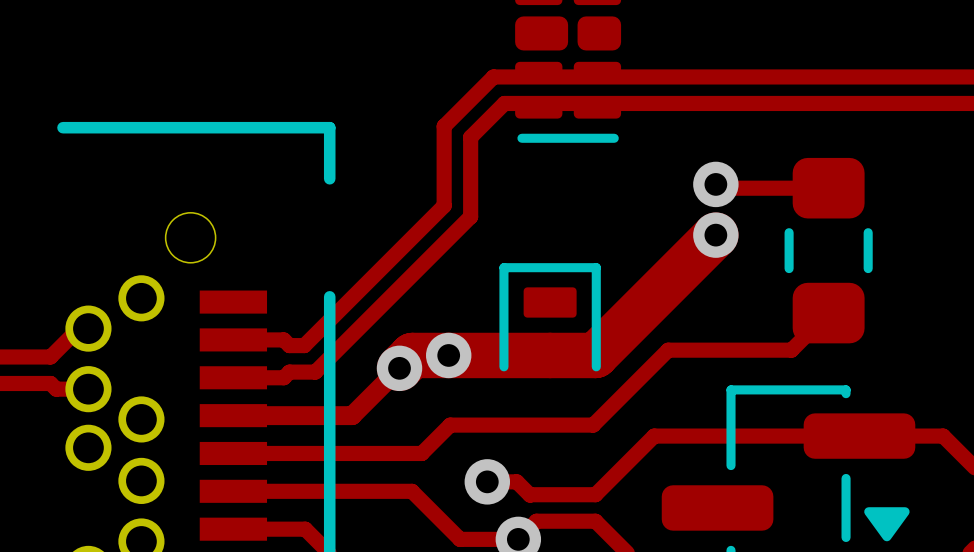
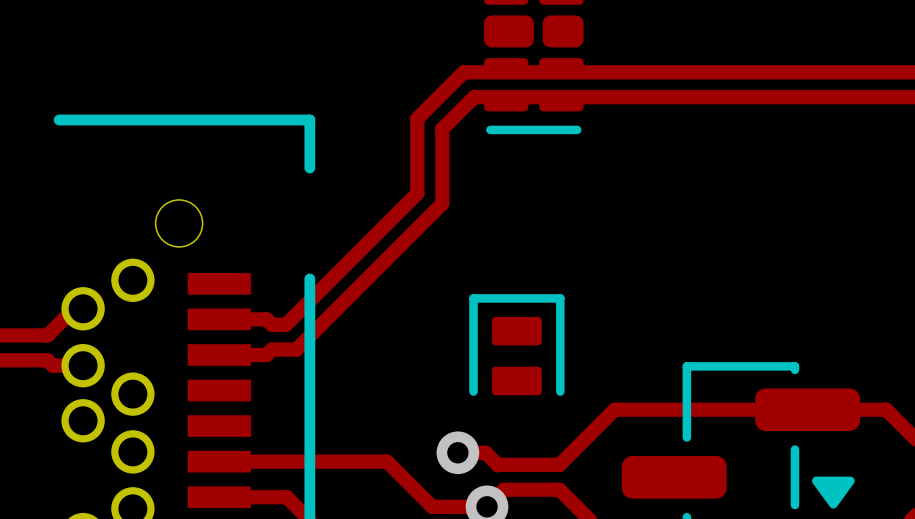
track: (715, 184) (719, 188) (828, 188) -> none
via: (715, 184) -> none
track: (715, 235) (595, 355) (412, 355) (352, 415) (233, 415) -> none
via: (715, 235) -> none
part: (828, 250) -> none
track: (828, 313) (791, 350) (668, 350) (593, 425) (450, 425) (421, 453) (233, 453) -> none
part position: (550, 317) -> (516, 345)
via: (448, 355) -> none
via: (399, 368) -> none

